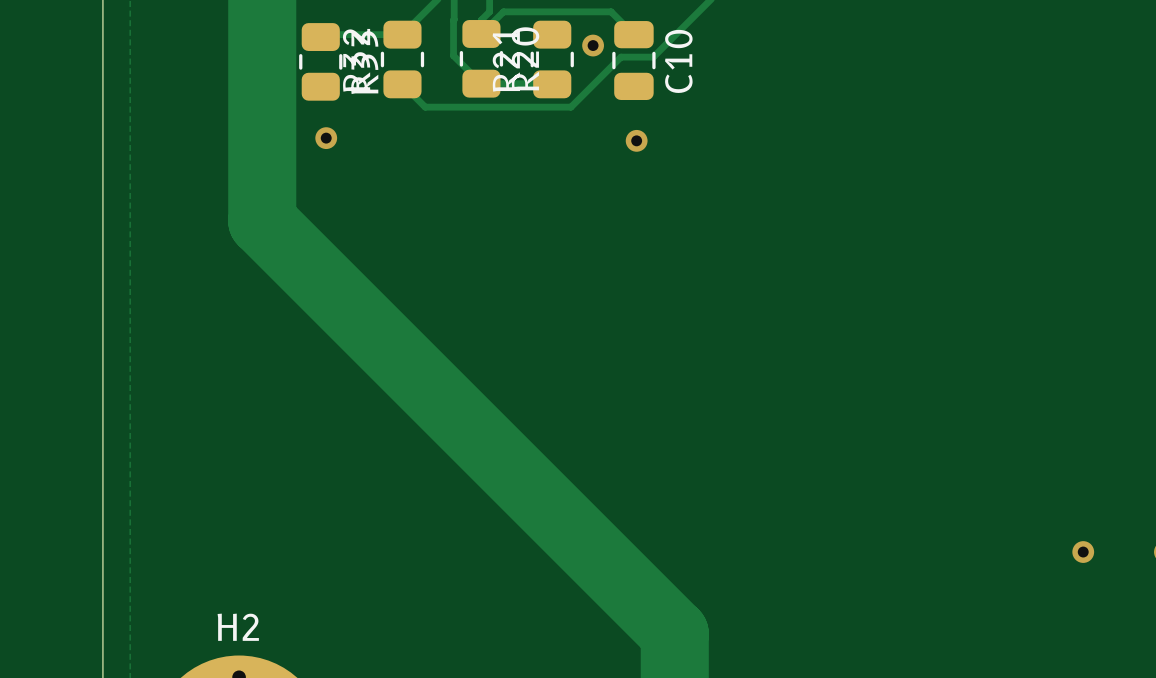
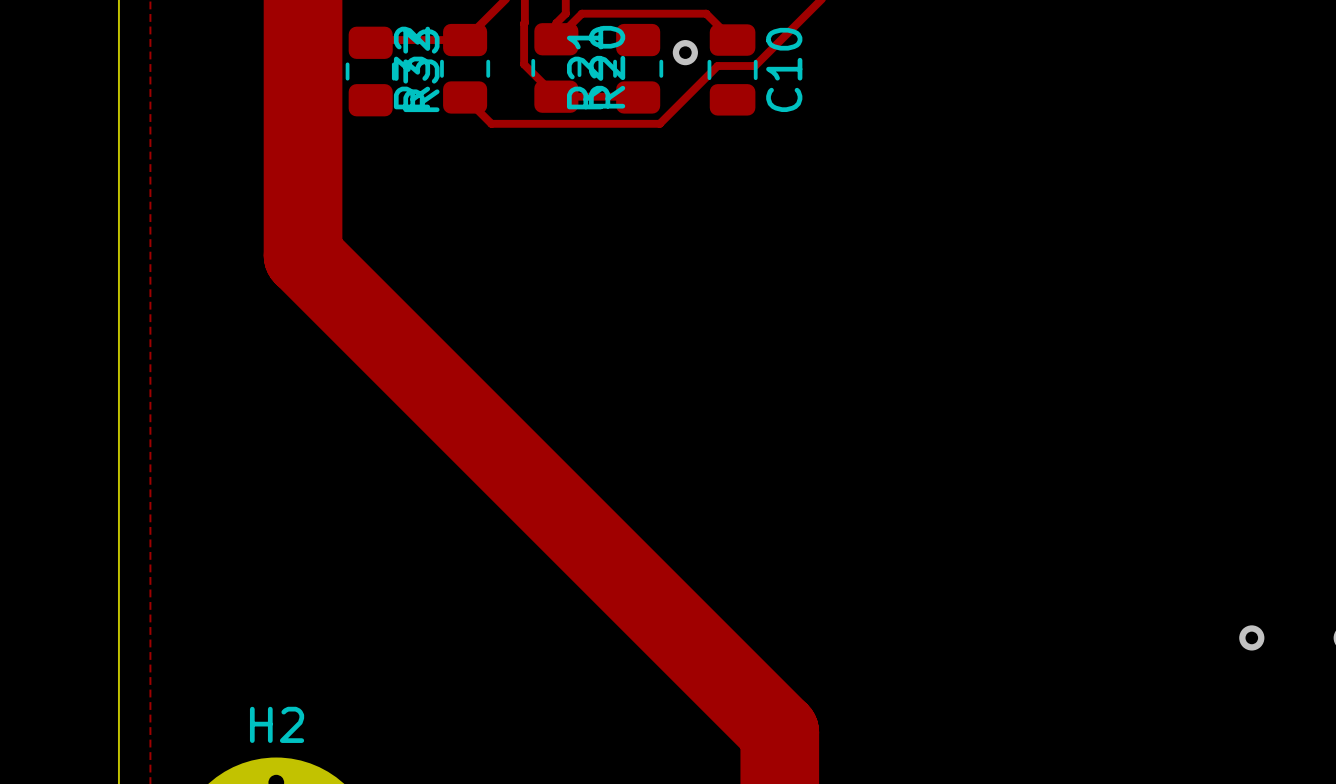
via: (326, 138) -> none
via: (636, 140) -> none

